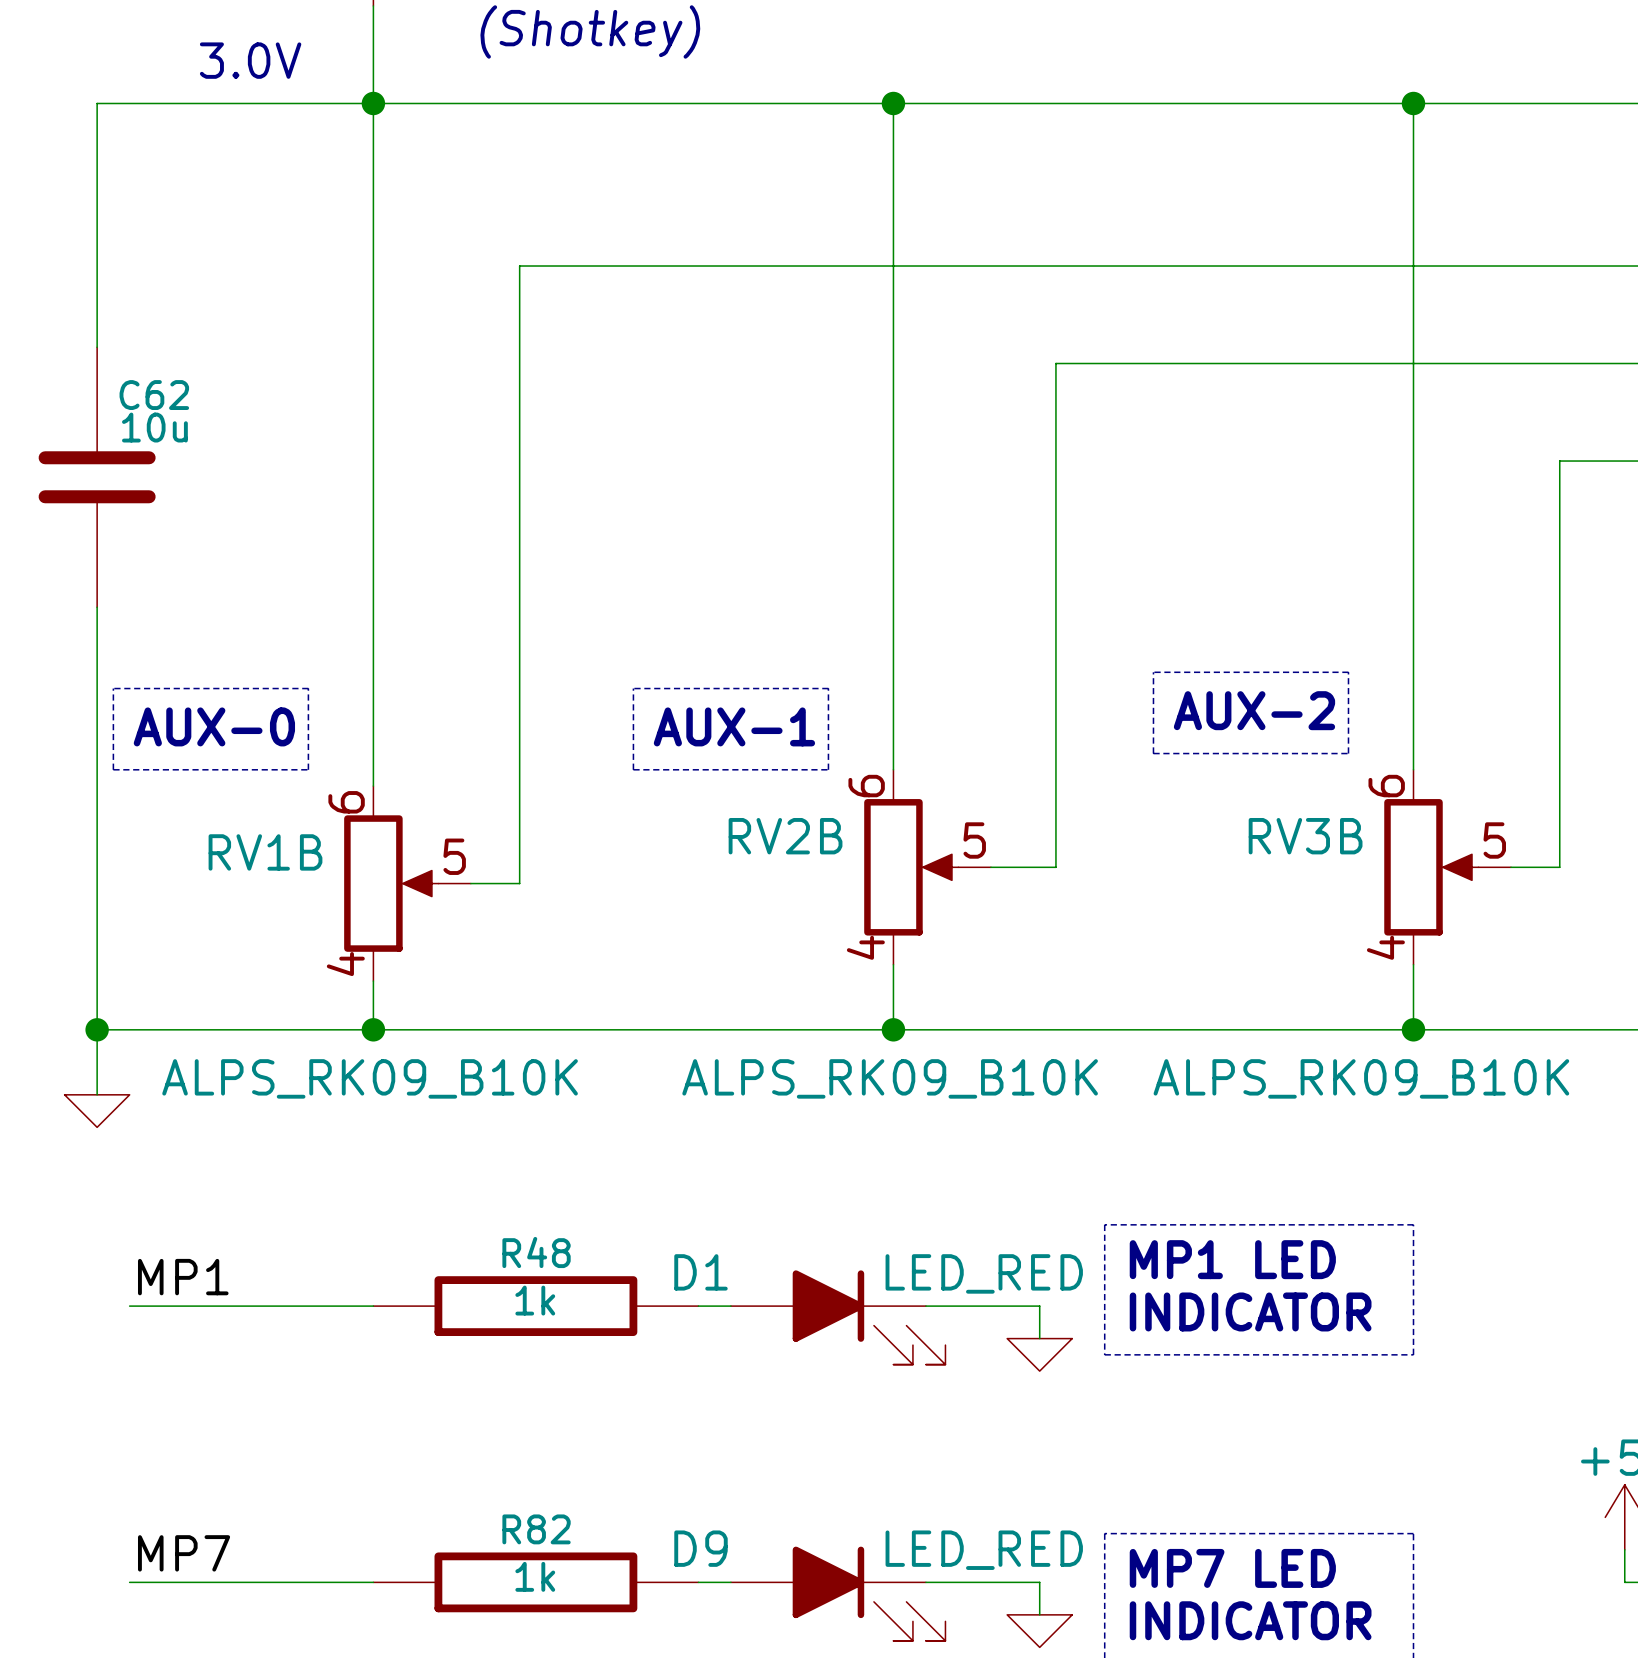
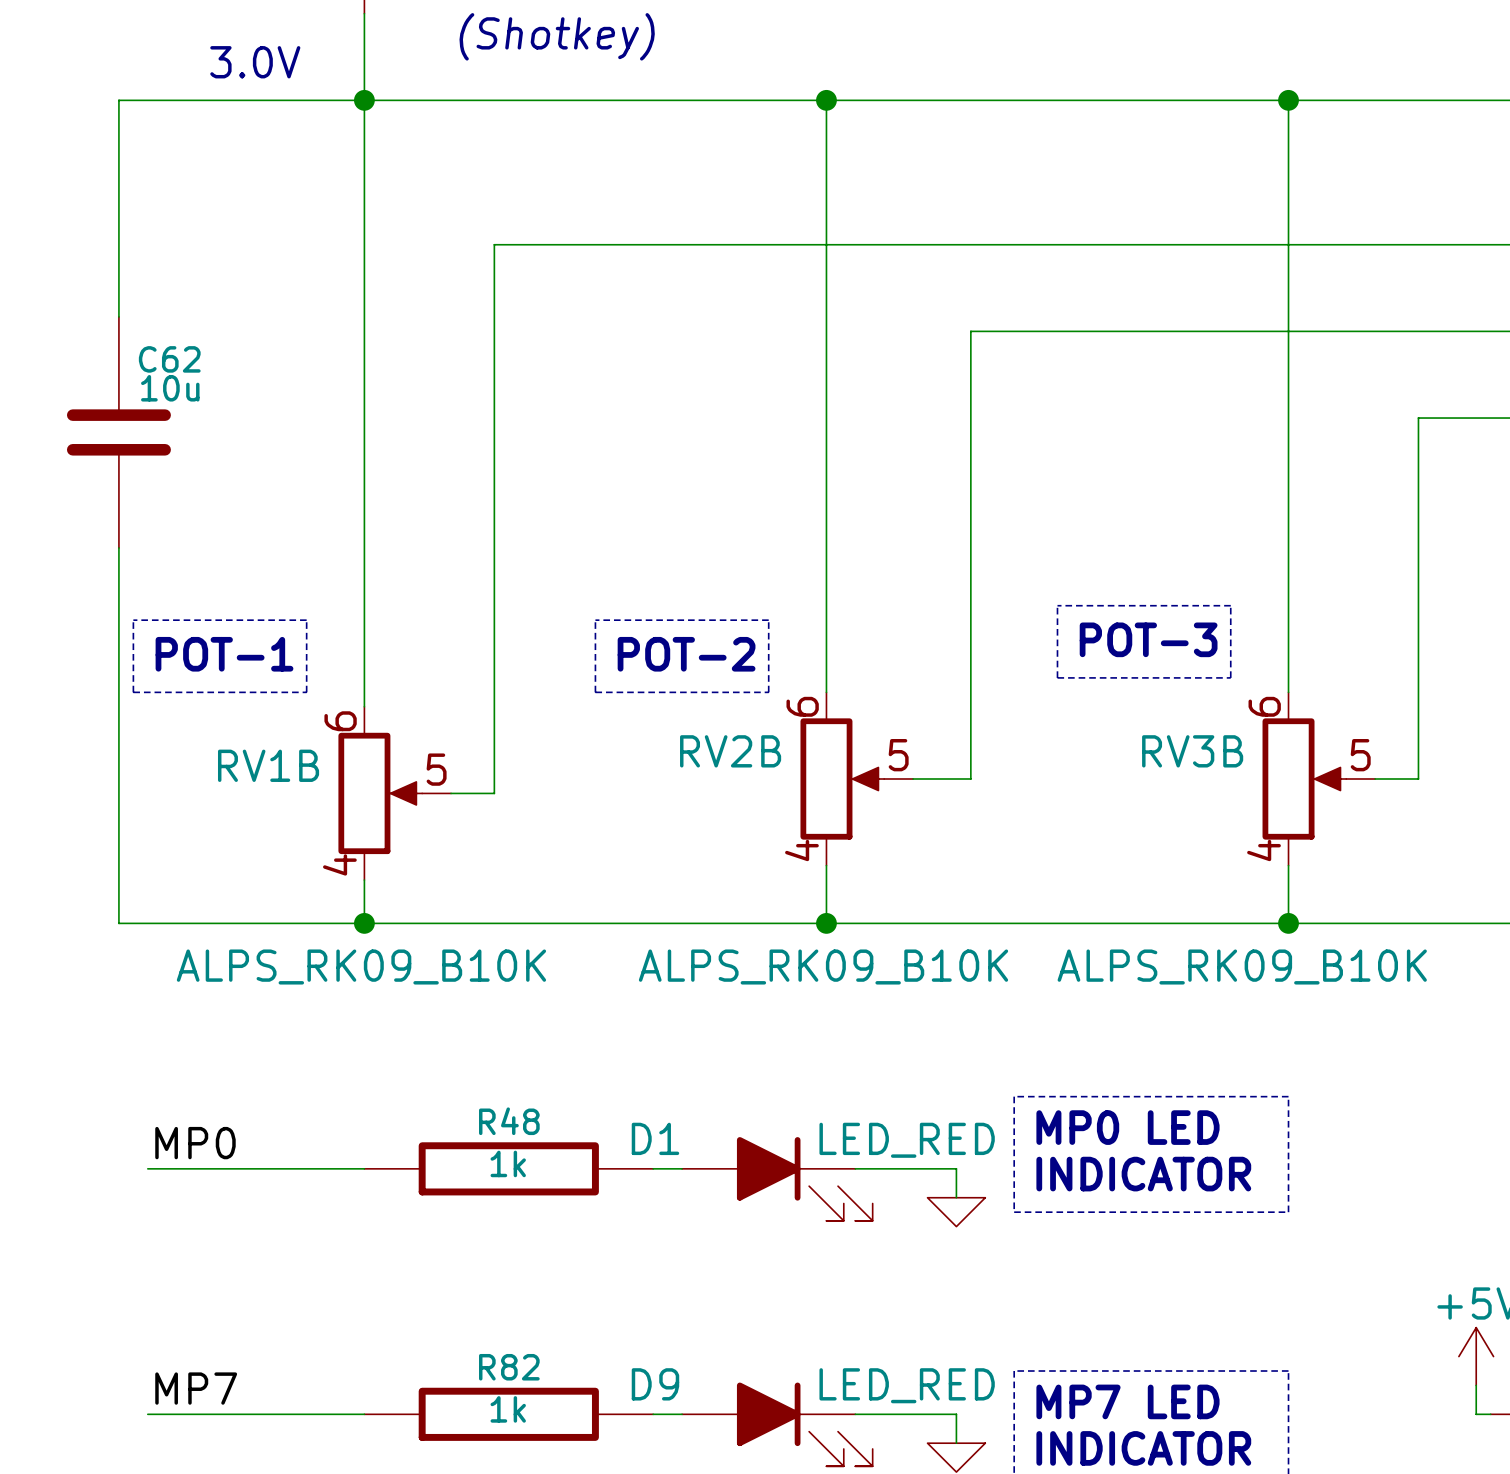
text: AUX-2 (1254, 710) -> POT-3 (1148, 639)
text: AUX-0 (214, 726) -> POT-1 (224, 654)
text: AUX-1 (734, 726) -> POT-2 (686, 654)
wire: (97, 1029) (97, 1094) -> none
junction: (97, 1029) -> none
power symbol: (97, 1111) -> none
text: MP1 LED (1232, 1259) -> MP0 LED (1127, 1127)
label: MP1 (183, 1277) -> MP0 (195, 1143)

